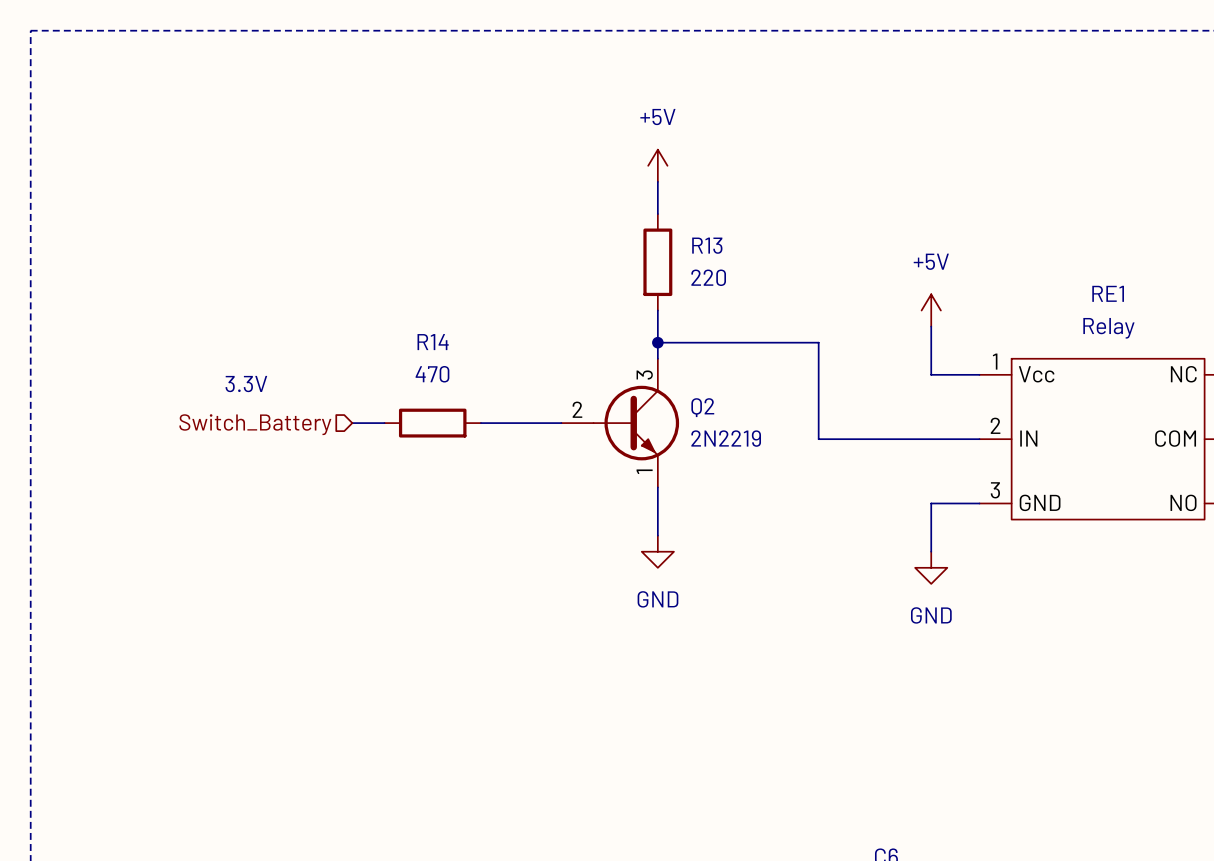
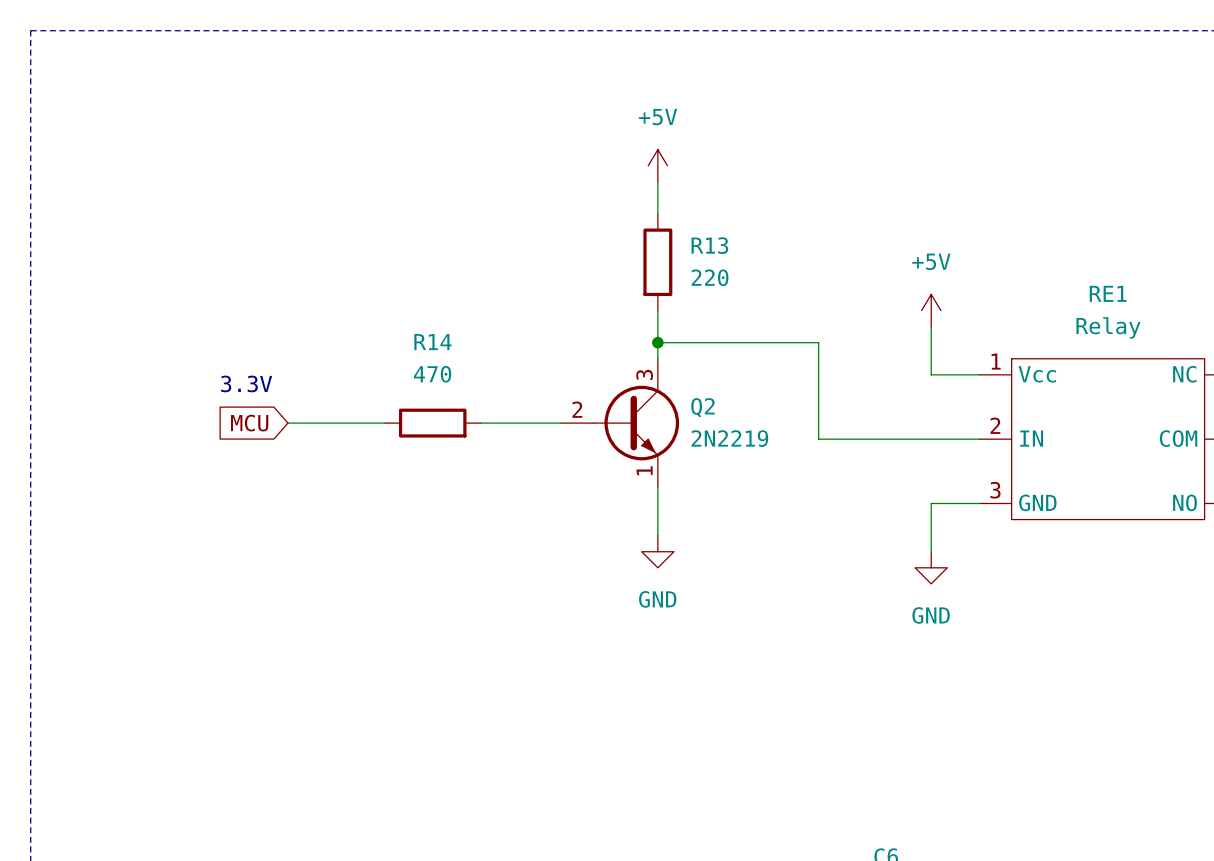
global label: none -> MCU (249, 423)
wire: none -> (288, 423) (352, 423)
hierarchical label: Switch_Battery (255, 424) -> none

